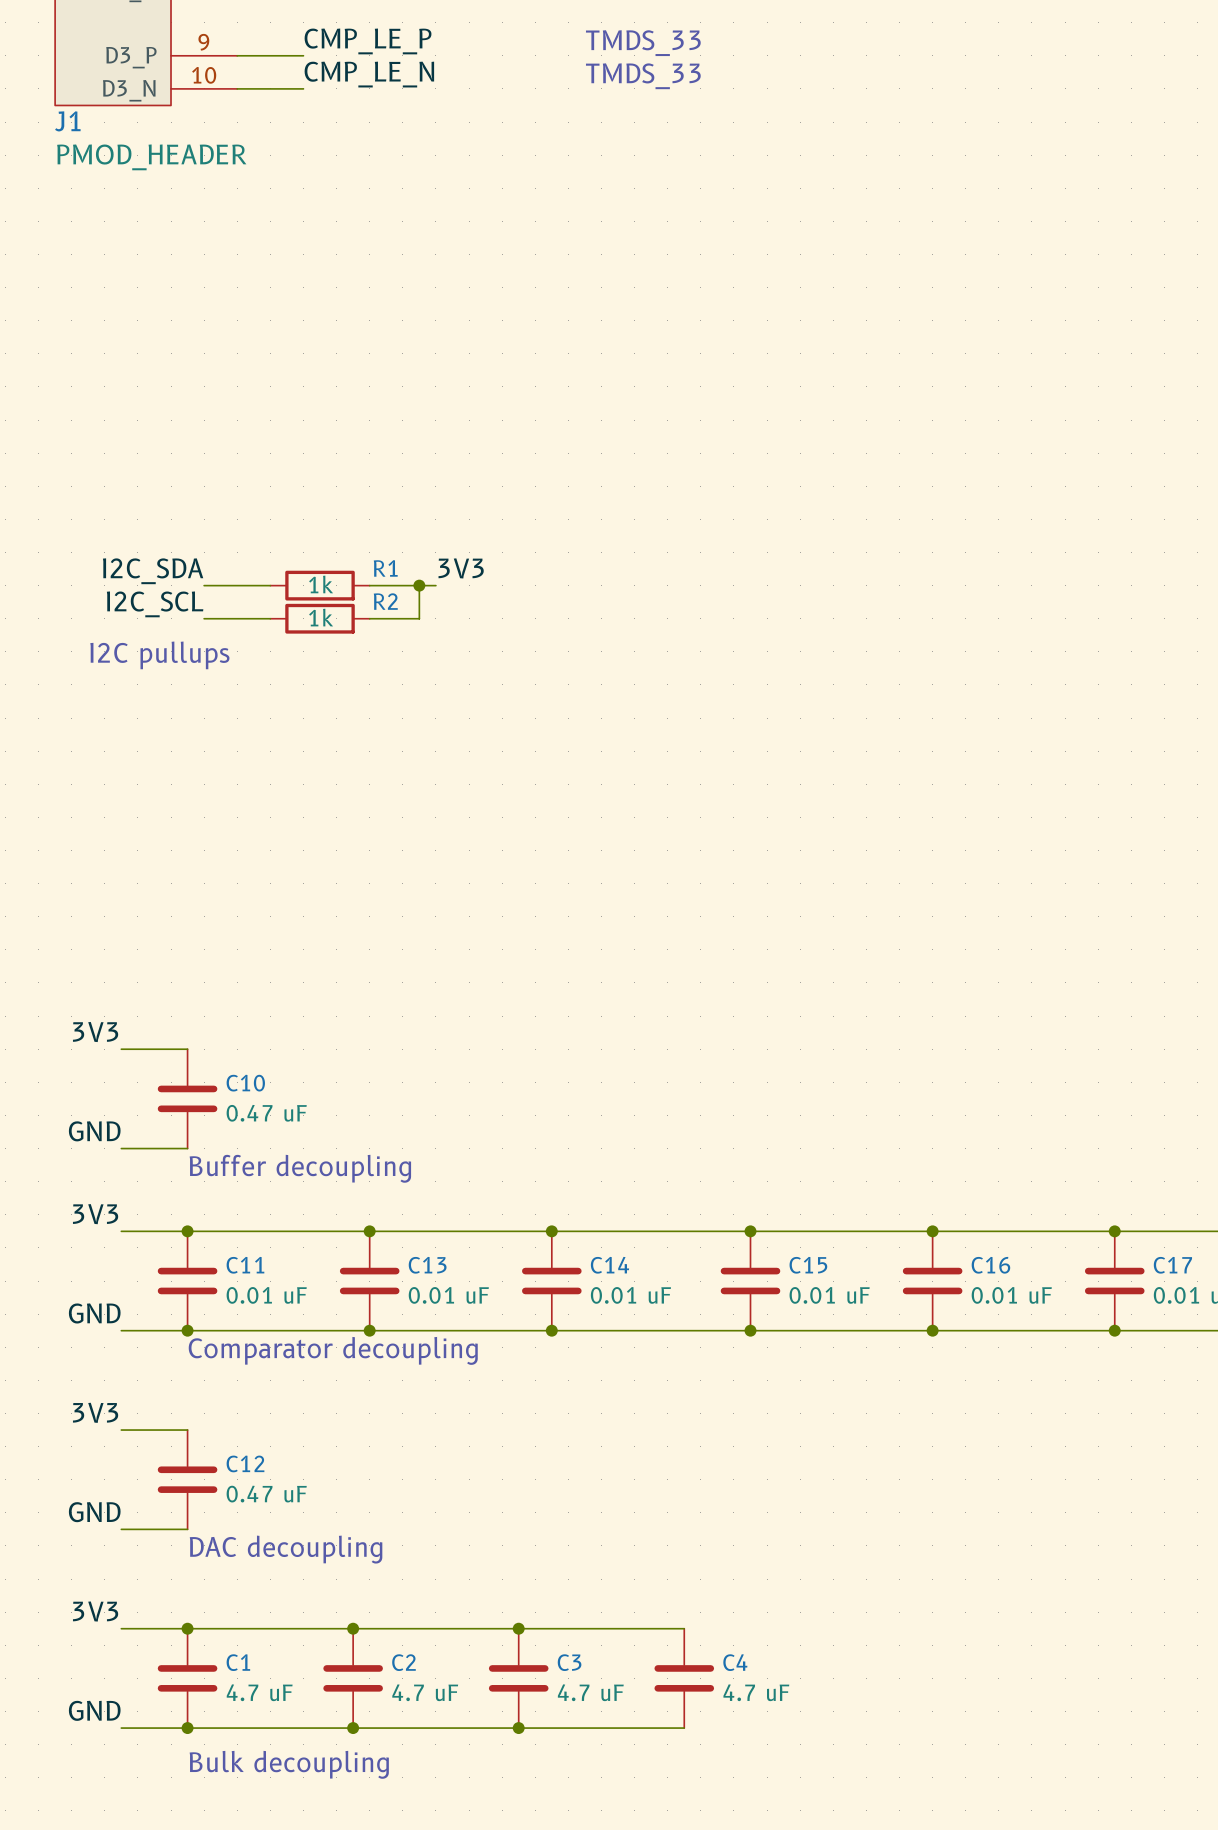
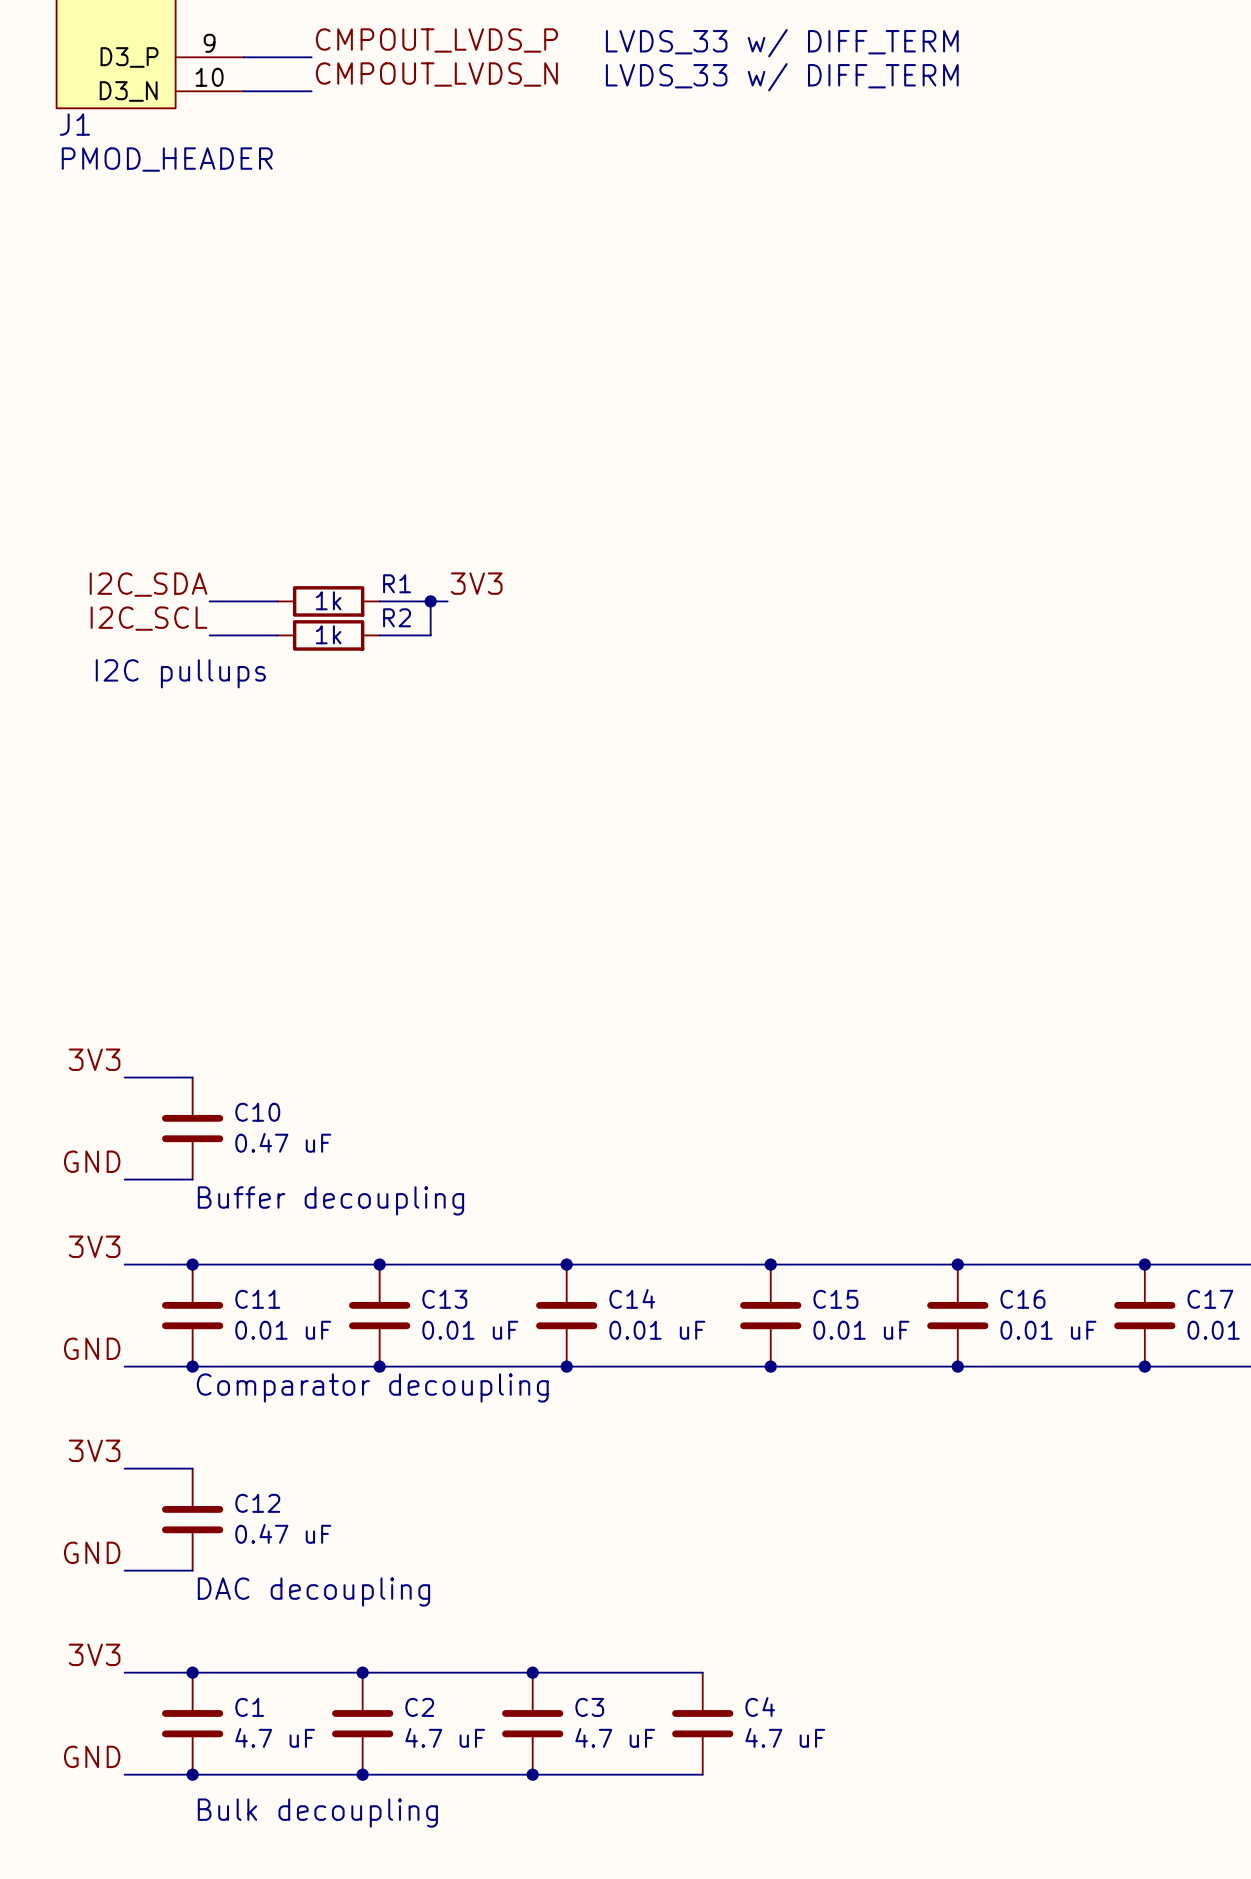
label: CMP_LE_P (368, 41) -> CMPOUT_LVDS_P (436, 40)
text: TMDS_33 (643, 43) -> LVDS_33 w/ DIFF_TERM (782, 43)
label: CMP_LE_N (369, 74) -> CMPOUT_LVDS_N (436, 74)
text: TMDS_33 (643, 76) -> LVDS_33 w/ DIFF_TERM (782, 77)

